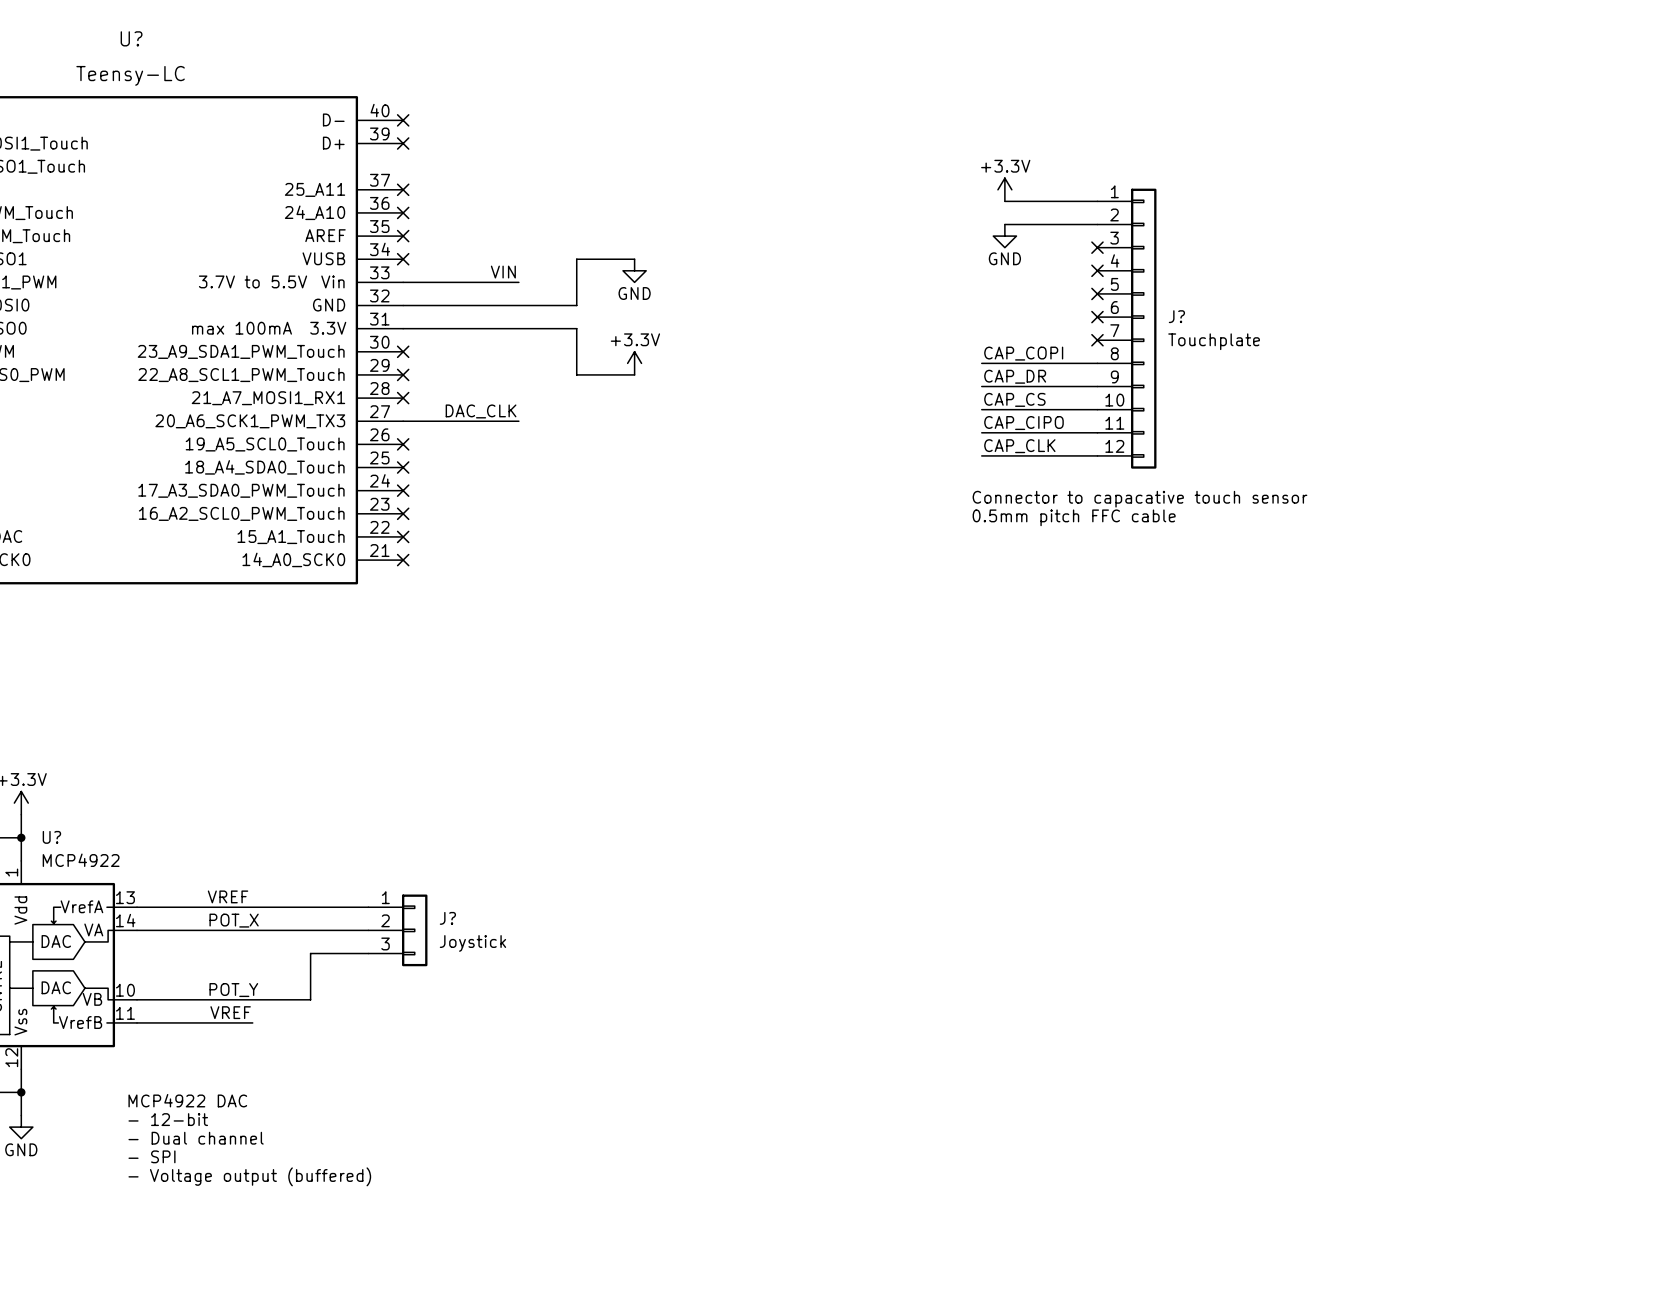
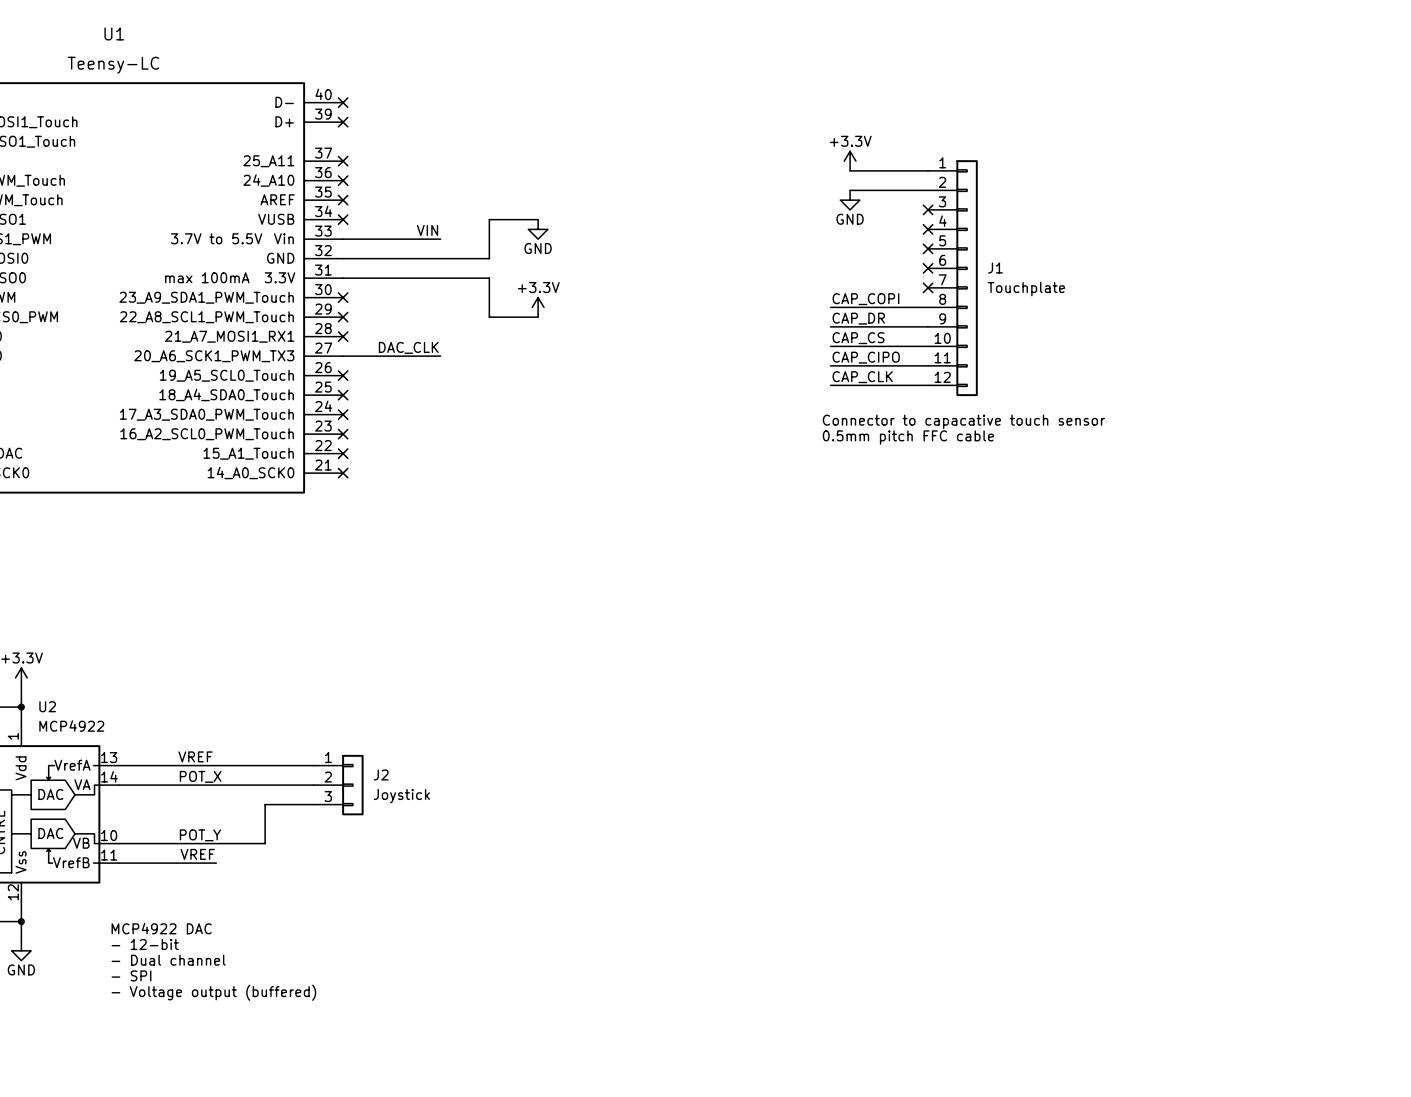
U? name: U? (131, 38) -> U1 (114, 33)
J? name: J? (1176, 316) -> J1 (995, 268)
U? name: U? (51, 837) -> U2 (47, 706)
J? name: J? (447, 918) -> J2 (381, 774)

